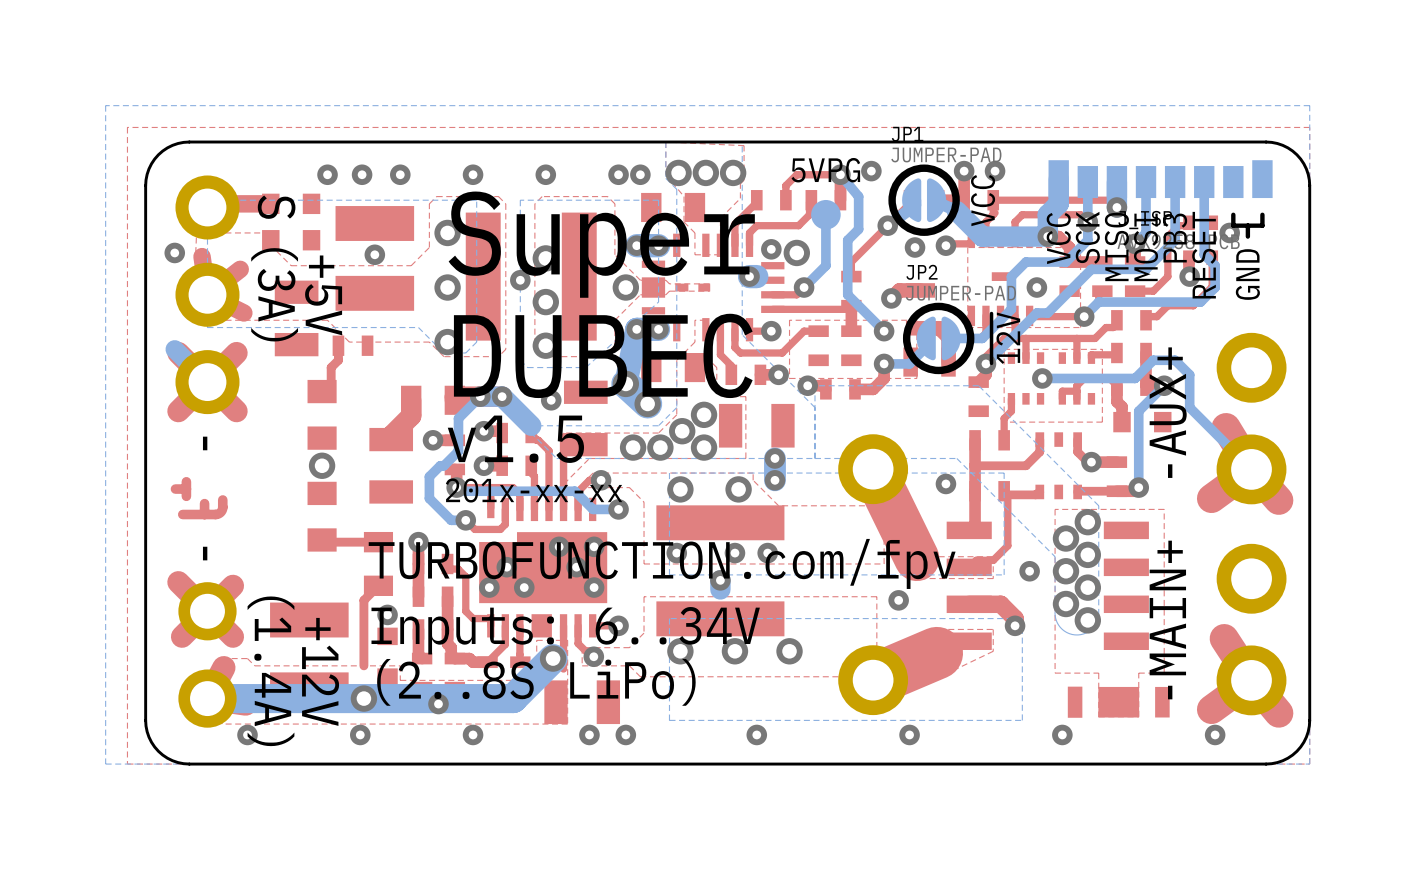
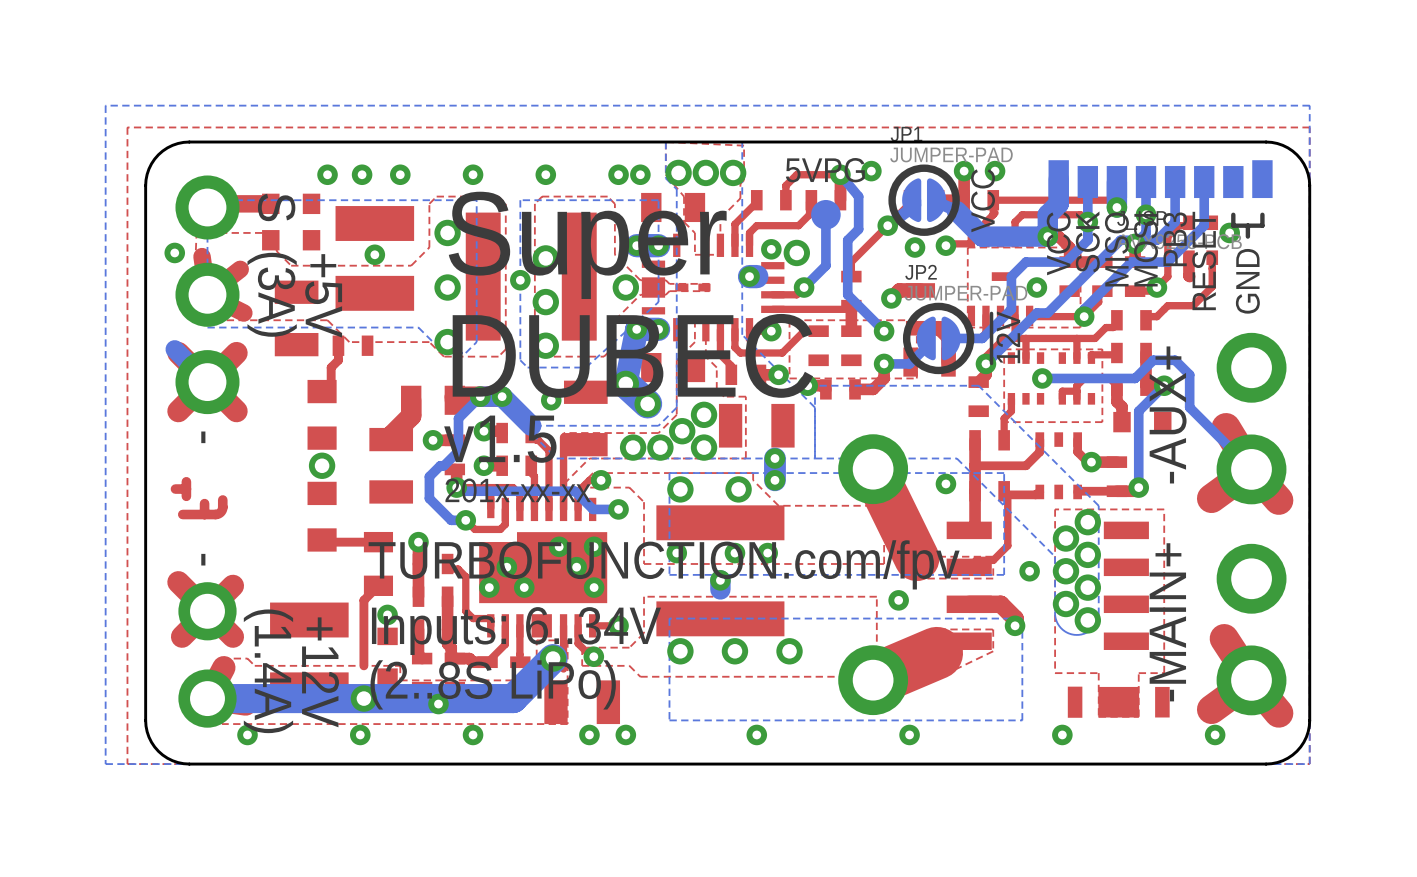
via: none -> (1146, 214)
bottom track: (1175, 222) (1175, 240) (1146, 269) (1091, 269) -> (1175, 222) (1156, 240) (1120, 240) (1091, 269)
bottom track: (1204, 225) (1204, 254) (1215, 265) (1215, 287) (1200, 302) (1098, 302) (1084, 316) -> (1204, 225) (1167, 262) (1131, 262) (1084, 309) (1084, 316)
via position: (1189, 276) -> (1156, 287)

